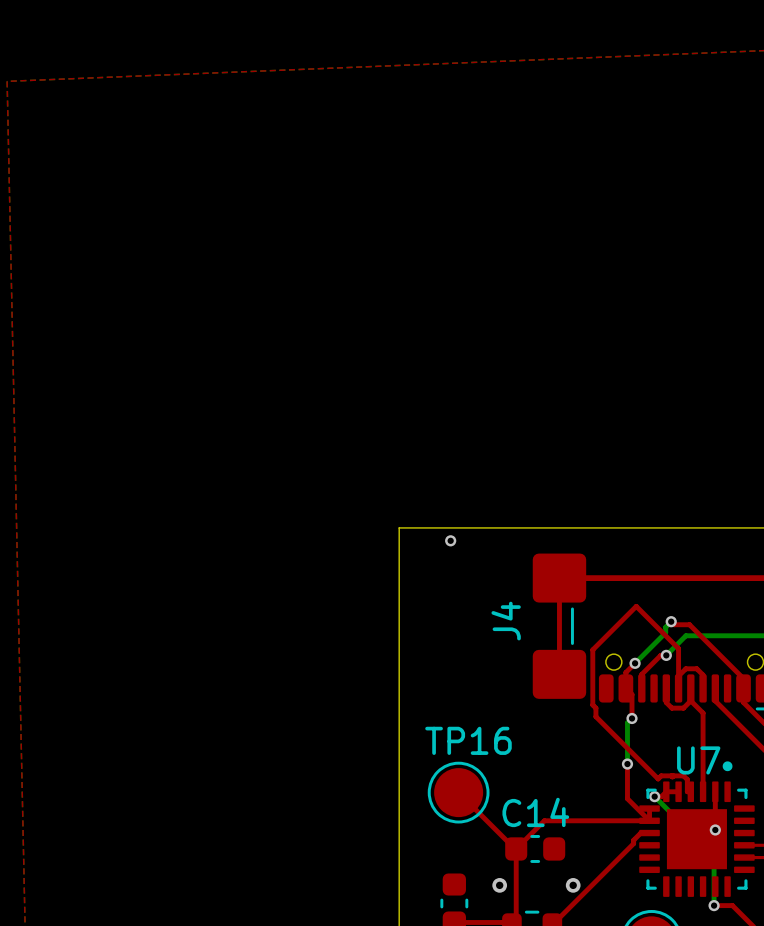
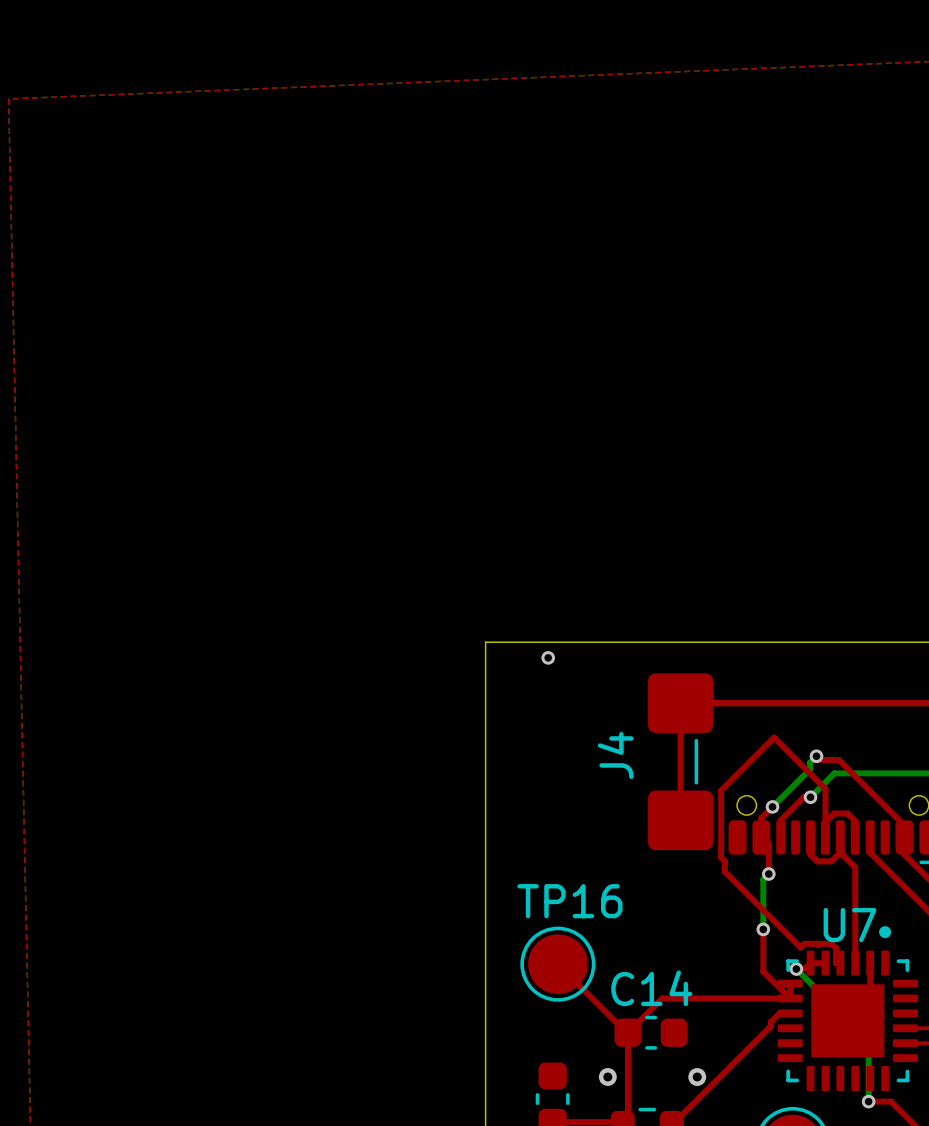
via: (715, 829) -> none

